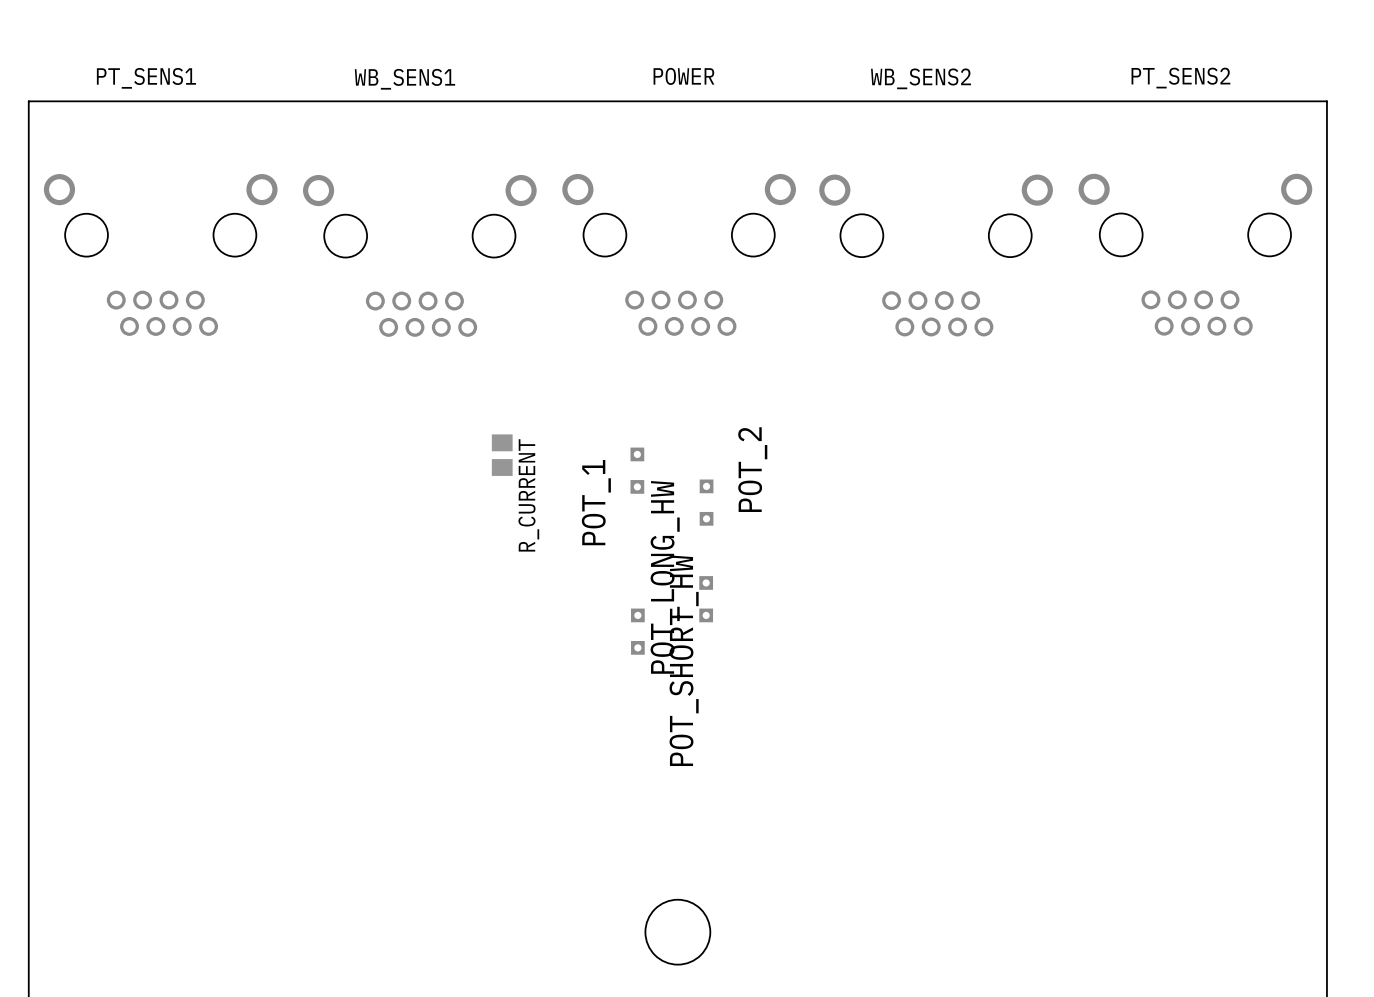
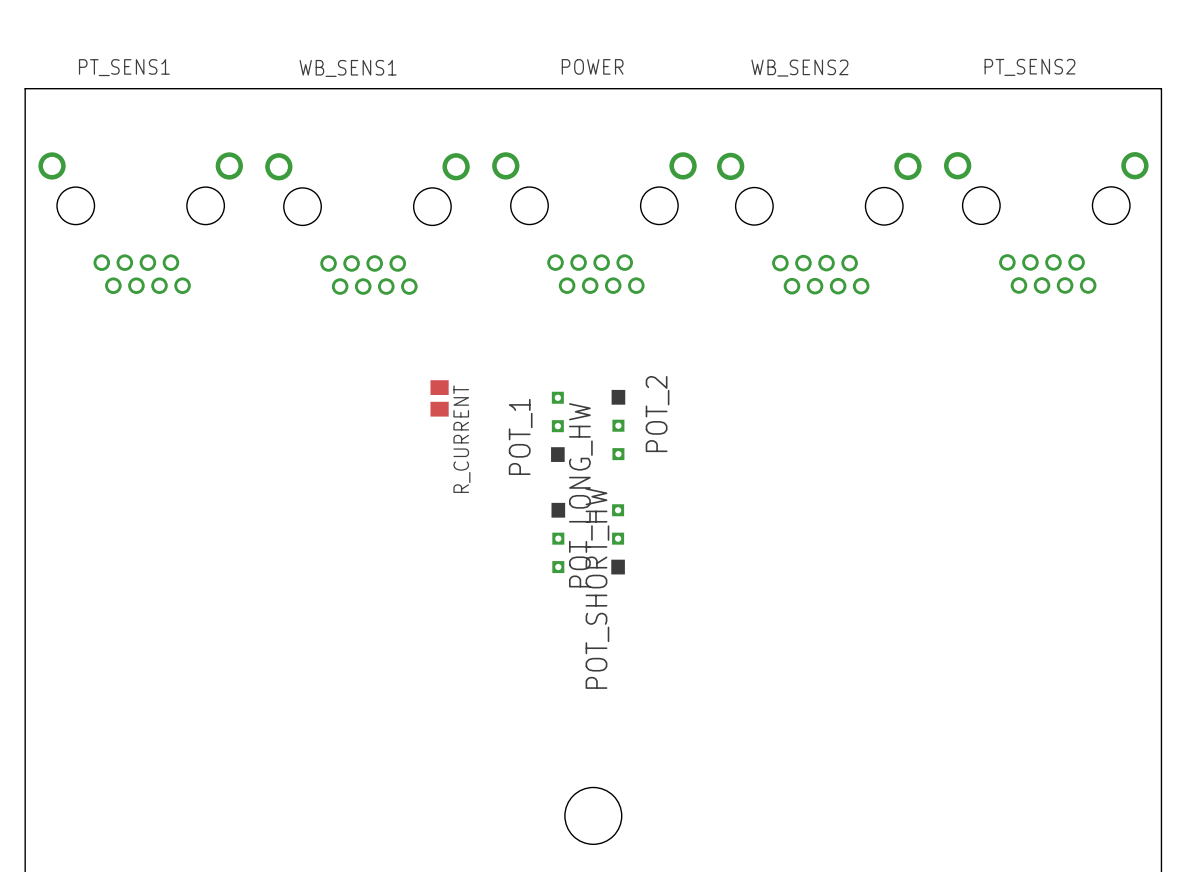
POT_1 footprint: [630, 447, 645, 494] -> [551, 391, 565, 462]
POT_2 footprint: [699, 479, 714, 526] -> [611, 389, 626, 461]
POT_SHORT_HW: none -> (558, 537)
POT_LONG_HW: none -> (618, 539)

